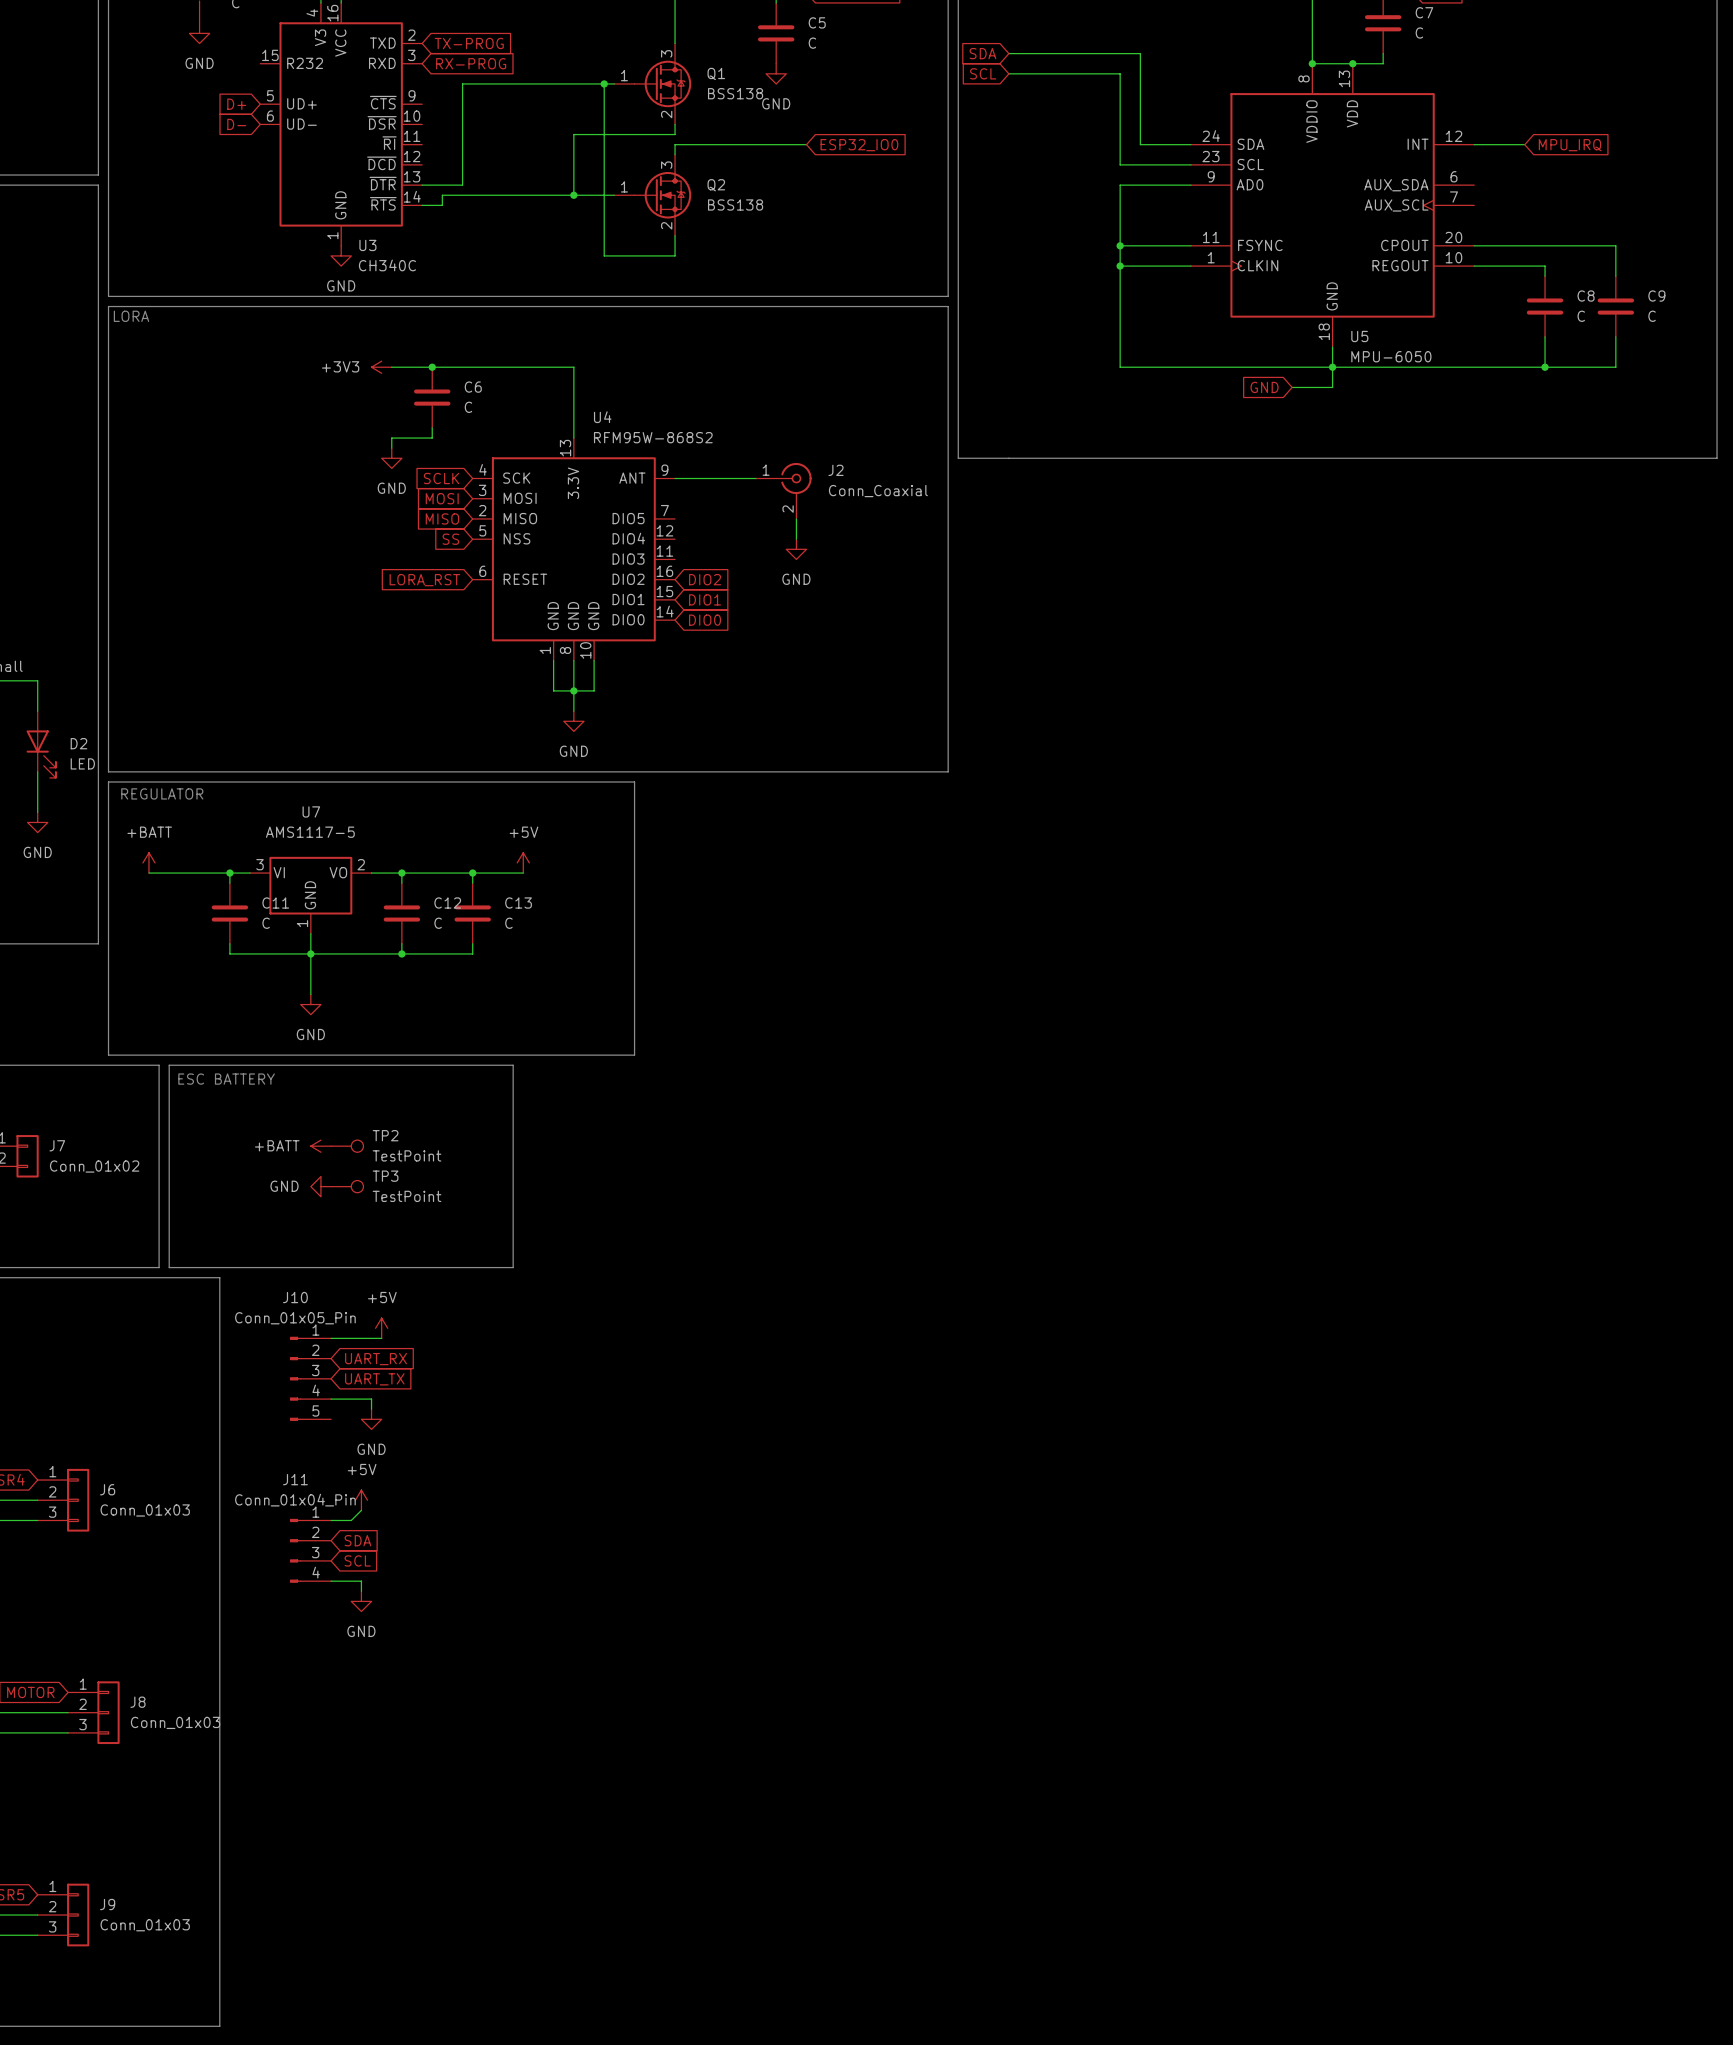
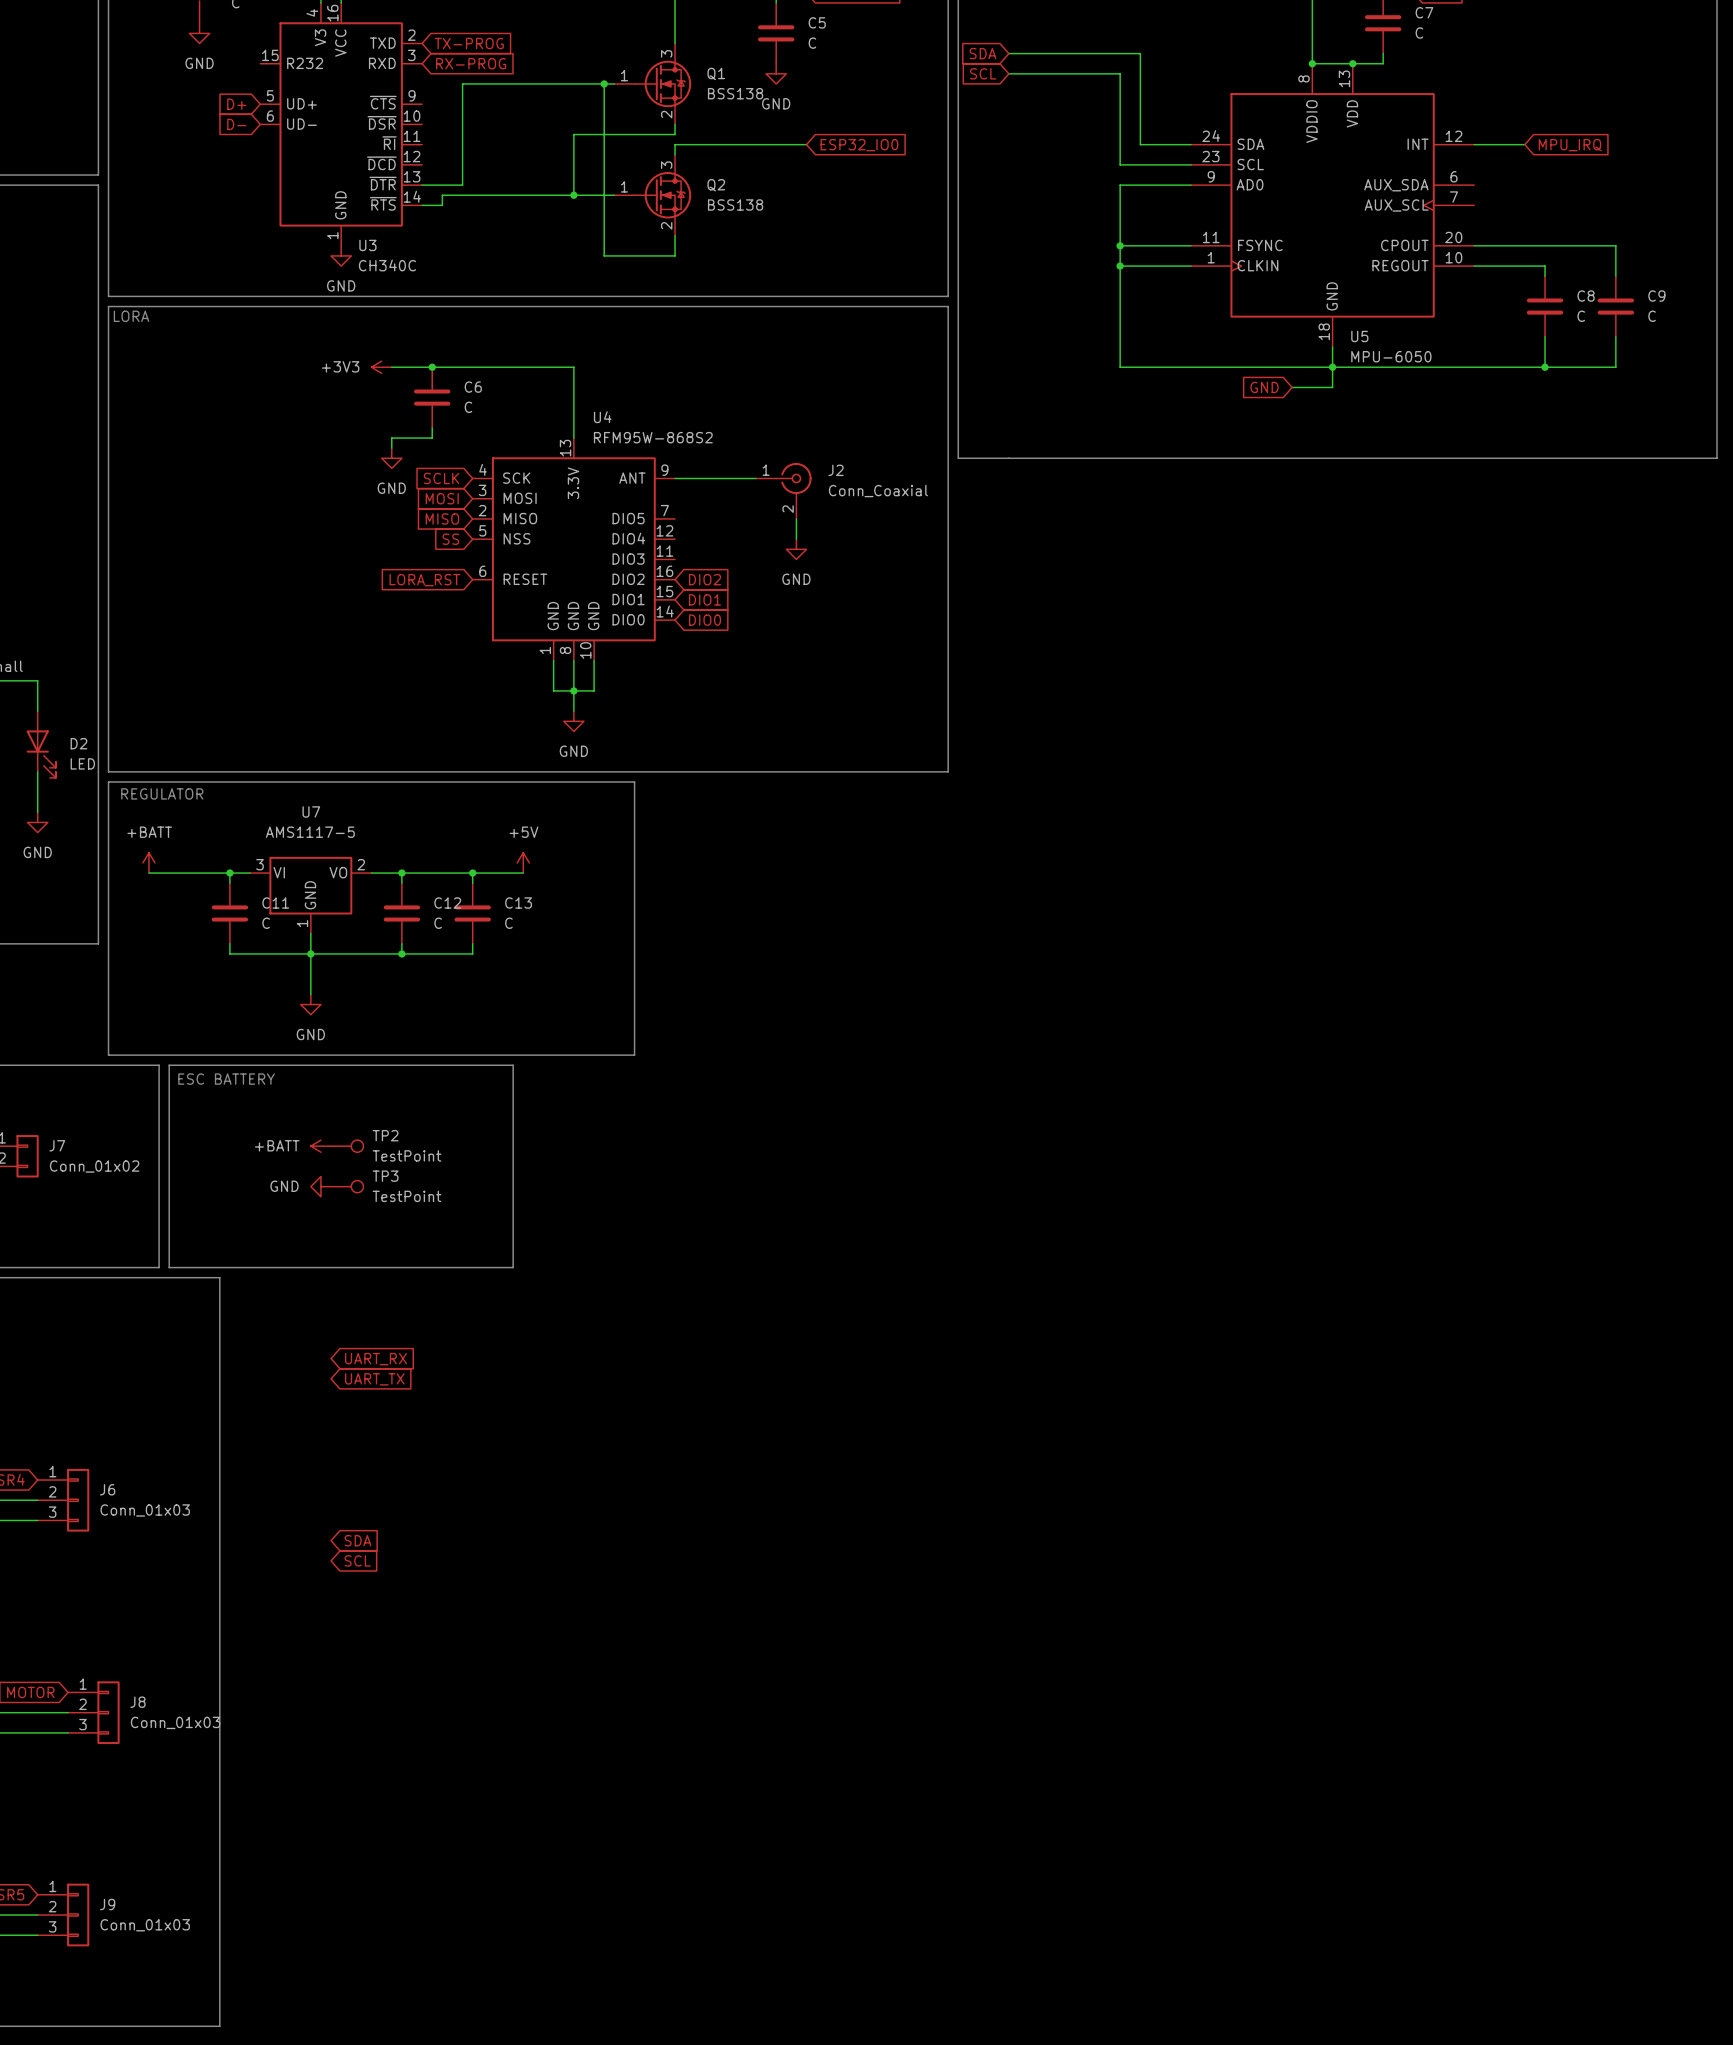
power symbol: +5V (381, 1328) -> none
wire: (331, 1338) (381, 1338) -> none
J10: Conn_01x05_Pin (310, 1378) -> none
wire: (331, 1399) (371, 1399) (371, 1409) -> none
power symbol: GND (371, 1419) -> none
power symbol: +5V (361, 1500) -> none
wire: (361, 1510) (351, 1520) (331, 1520) -> none
J11: Conn_01x04_Pin (310, 1550) -> none
wire: (331, 1581) (361, 1581) (361, 1591) -> none
power symbol: GND (361, 1601) -> none

